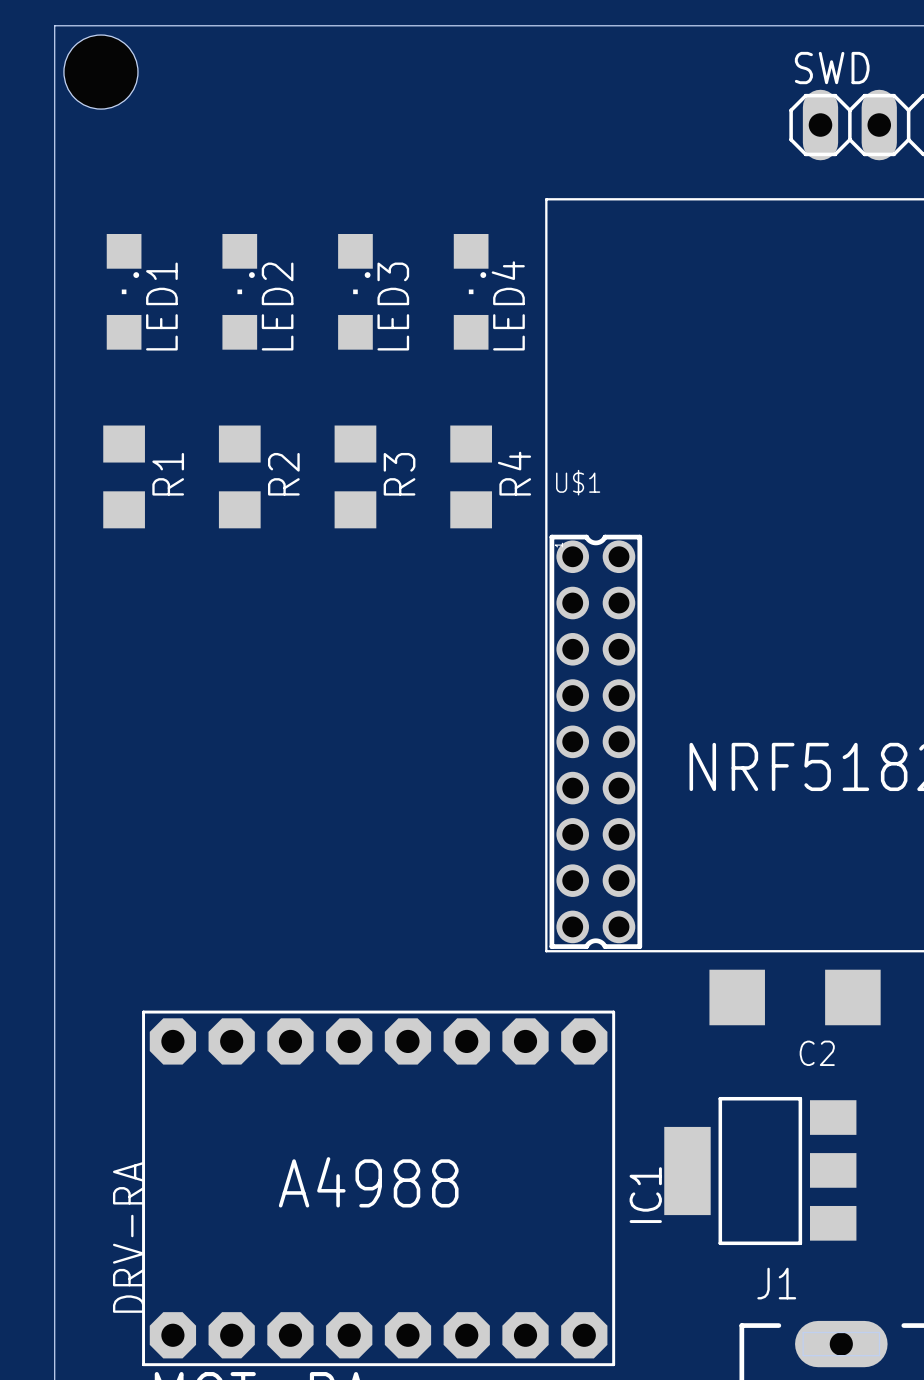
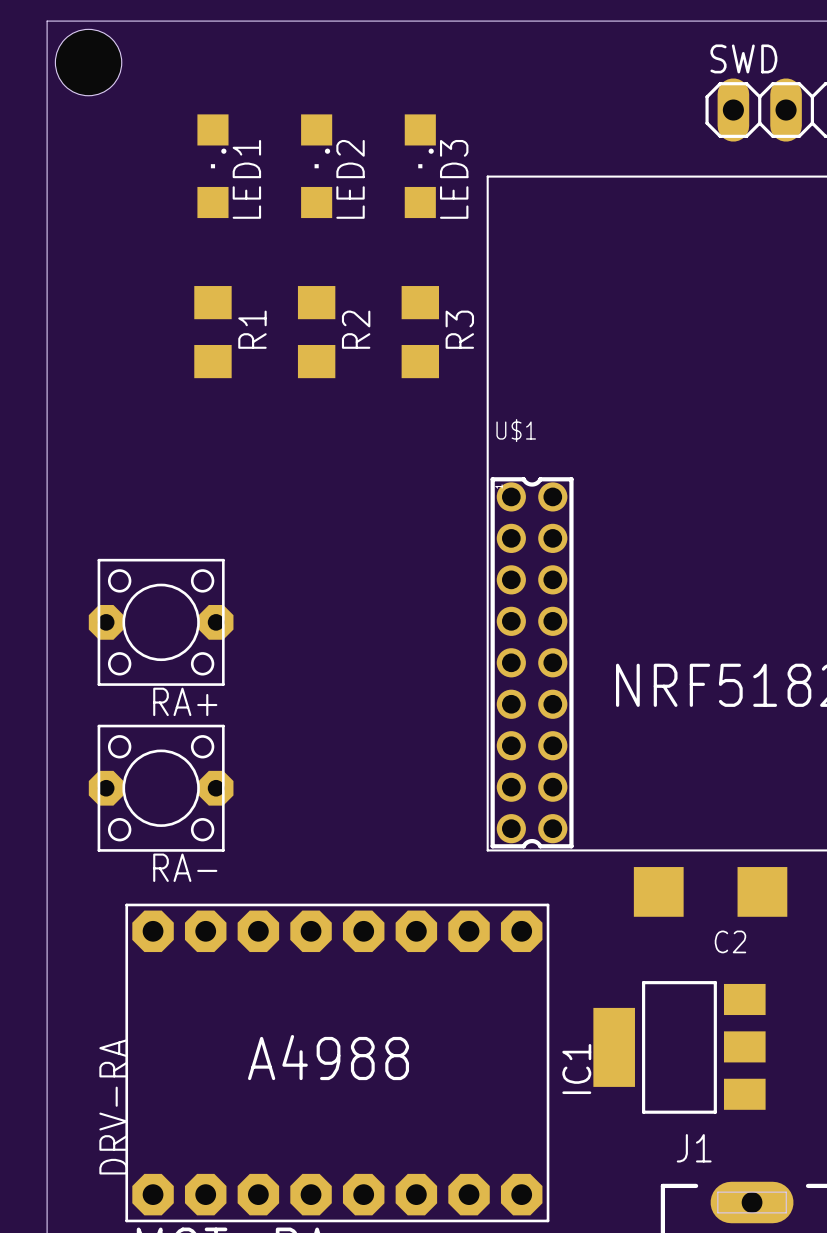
LED1 position: (124, 291) -> (212, 166)
LED2 position: (239, 291) -> (316, 166)
LED3 position: (355, 291) -> (420, 166)
LED4: (471, 291) -> none
R1 position: (124, 476) -> (212, 332)
R2 position: (239, 476) -> (316, 332)
R3 position: (355, 476) -> (420, 332)
R4: (471, 476) -> none
RA+: none -> (161, 622)
RA-: none -> (161, 788)

